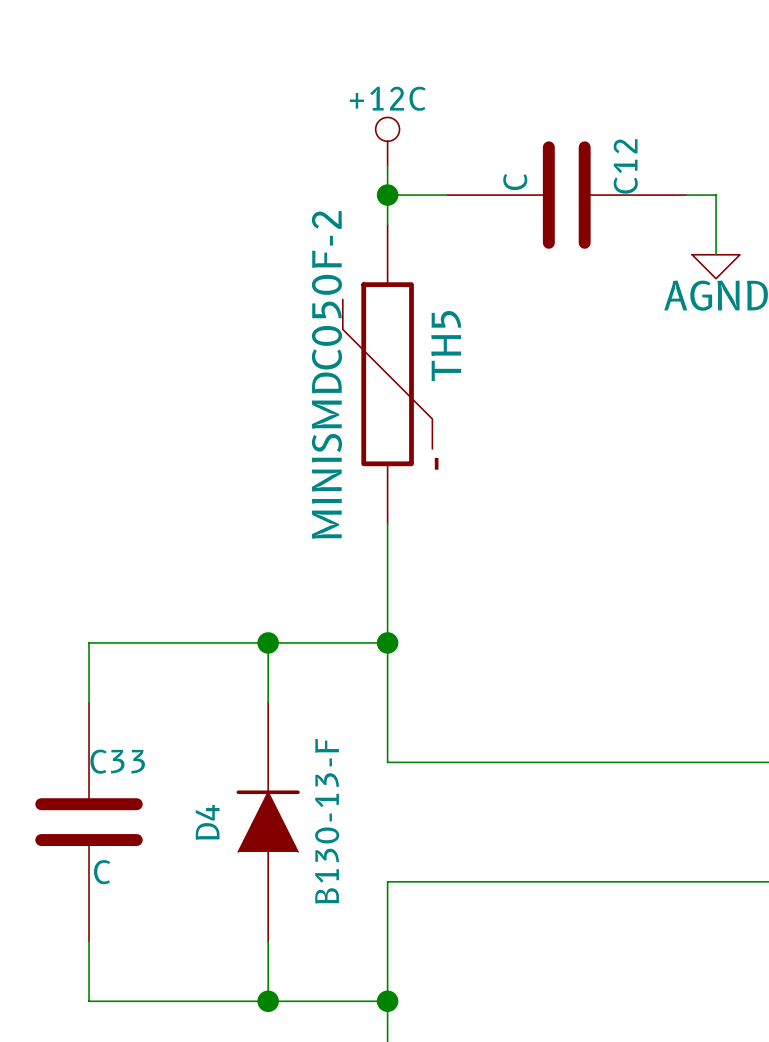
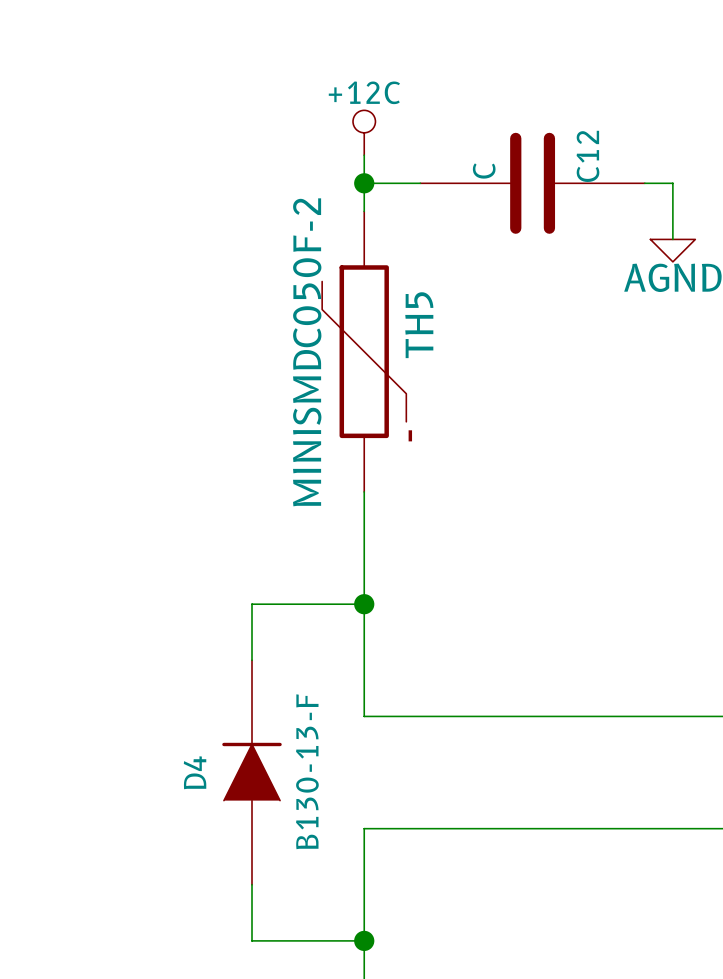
wire: (268, 642) (89, 642) (89, 702) -> none
junction: (268, 642) -> none
C33: C (89, 822) -> none
wire: (89, 941) (89, 1001) (268, 1001) -> none
junction: (268, 1001) -> none

